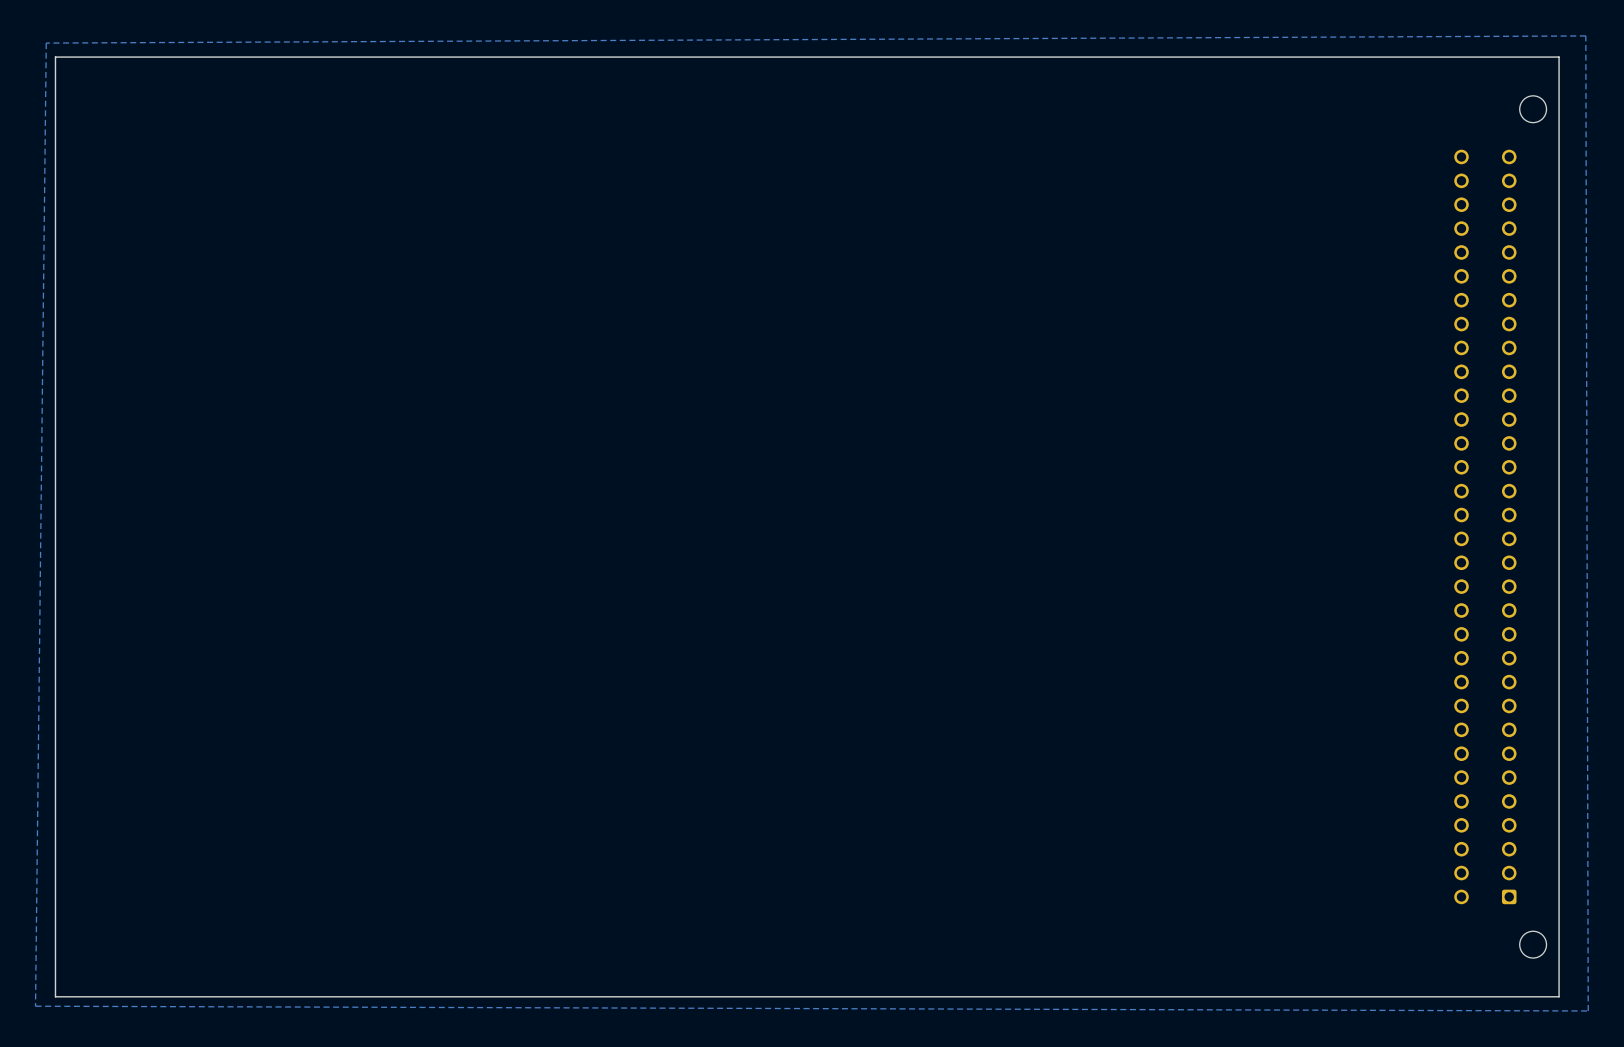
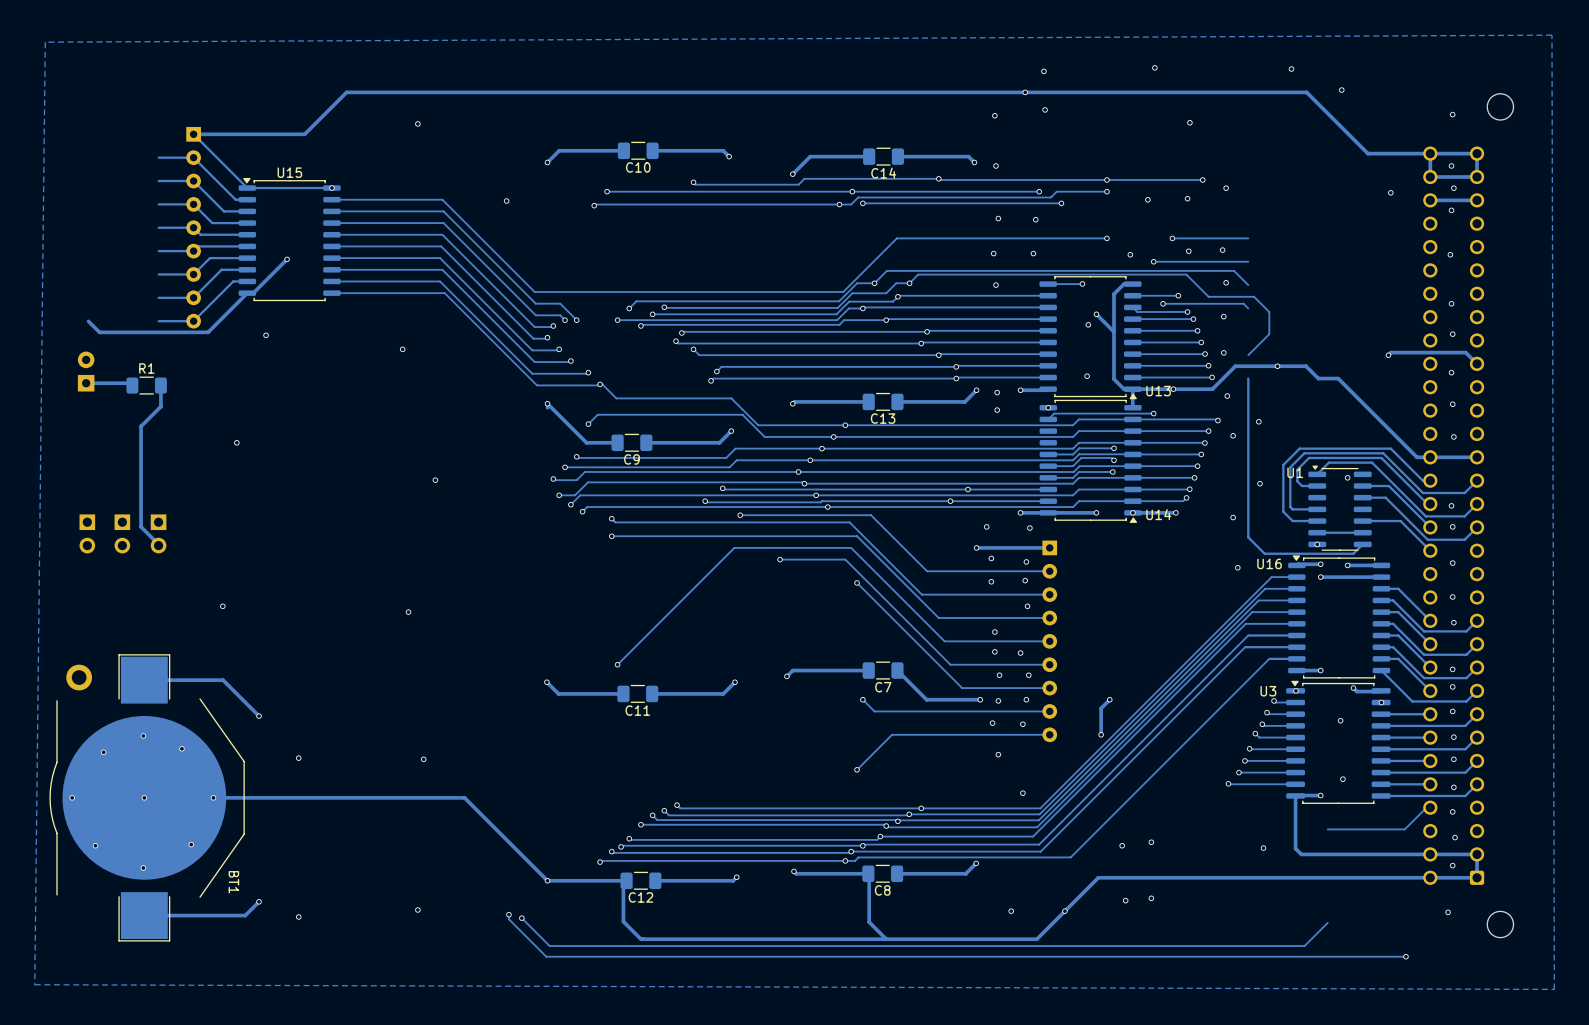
board edge: (1559, 57) (55, 57) (55, 996) (1559, 996) (1559, 57) -> none
via: none -> (1154, 67)
via: none -> (1291, 69)
via: none -> (1043, 71)
via: none -> (1341, 90)
via: none -> (1025, 92)
via: none -> (1045, 109)
via: none -> (1452, 114)
via: none -> (994, 115)
via: none -> (1189, 122)
via: none -> (417, 123)
track: none -> (623, 150) (559, 150) (547, 162)
C10: none -> (638, 150)
track: none -> (652, 150) (723, 150) (729, 156)
track: none -> (1430, 153) (1430, 176) (1477, 176) (1477, 153) (1367, 153) (1306, 92) (346, 92) (304, 134) (193, 134) (247, 188) (331, 188)
via: none -> (729, 156)
track: none -> (869, 156) (810, 156) (792, 174)
C14: none -> (883, 156)
track: none -> (897, 156) (968, 156) (974, 162)
track: none -> (158, 157) (193, 157) (235, 199) (247, 199)
via: none -> (547, 162)
via: none -> (974, 162)
via: none -> (996, 165)
via: none -> (1451, 165)
via: none -> (792, 174)
via: none -> (938, 178)
via: none -> (1106, 179)
track: none -> (1202, 179) (804, 178) (798, 184) (695, 184) (693, 182)
via: none -> (1202, 179)
track: none -> (158, 181) (193, 181) (223, 211) (247, 211)
via: none -> (693, 182)
via: none -> (331, 188)
via: none -> (1226, 188)
via: none -> (1453, 188)
via: none -> (607, 191)
via: none -> (852, 191)
track: none -> (1039, 191) (607, 191)
via: none -> (1039, 191)
track: none -> (1106, 191) (1056, 191) (1050, 197) (858, 197) (851, 204) (594, 205)
via: none -> (1106, 191)
via: none -> (1390, 192)
via: none -> (1187, 198)
track: none -> (331, 199) (442, 199) (534, 291) (843, 291) (896, 238) (1106, 238)
via: none -> (1147, 199)
track: none -> (1477, 200) (1430, 200)
via: none -> (506, 201)
via: none -> (862, 203)
track: none -> (1061, 203) (862, 203)
via: none -> (1061, 203)
track: none -> (158, 204) (193, 204) (212, 223) (247, 223)
via: none -> (839, 204)
via: none -> (594, 205)
via: none -> (1451, 210)
track: none -> (331, 211) (443, 211) (535, 303) (560, 303) (576, 320)
via: none -> (998, 218)
via: none -> (1035, 219)
track: none -> (331, 223) (443, 223) (535, 315) (560, 315) (565, 320)
track: none -> (158, 227) (193, 227) (200, 234) (247, 234)
part: none -> (193, 227)
track: none -> (331, 234) (442, 234) (534, 327) (553, 325)
via: none -> (1106, 238)
via: none -> (1172, 238)
track: none -> (1248, 238) (1172, 238)
U15: none -> (289, 239)
track: none -> (247, 246) (198, 246) (193, 251) (158, 251)
track: none -> (331, 246) (441, 246) (533, 338) (547, 337)
via: none -> (1222, 250)
via: none -> (1188, 251)
via: none -> (993, 253)
via: none -> (1033, 253)
via: none -> (1130, 254)
via: none -> (1450, 254)
track: none -> (247, 258) (209, 258) (193, 274) (158, 274)
track: none -> (331, 258) (440, 258) (532, 350) (559, 349)
track: none -> (287, 259) (253, 293) (247, 293) (208, 332) (99, 332) (88, 321)
via: none -> (287, 259)
via: none -> (1153, 261)
track: none -> (1248, 261) (1153, 261)
track: none -> (247, 269) (221, 269) (193, 297) (158, 297)
track: none -> (331, 269) (442, 269) (534, 362) (570, 361)
track: none -> (247, 281) (233, 281) (193, 321) (158, 321)
track: none -> (331, 281) (440, 281) (532, 373) (588, 372)
via: none -> (1226, 282)
via: none -> (874, 283)
via: none -> (909, 283)
track: none -> (1082, 283) (1048, 284)
via: none -> (1082, 283)
track: none -> (1132, 284) (1124, 284) (1113, 294) (1113, 379) (1124, 389) (1212, 389) (1235, 366) (1306, 366) (1318, 378) (1338, 378) (1417, 457) (1477, 457)
via: none -> (996, 285)
track: none -> (1248, 285) (1234, 270) (886, 270) (874, 283) (857, 283) (839, 301) (636, 301) (629, 308)
track: none -> (331, 293) (444, 293) (537, 385) (602, 384) (616, 398) (731, 398) (758, 425) (1073, 425) (1078, 419) (1217, 420)
track: none -> (1048, 295) (898, 295) (893, 301) (849, 301) (836, 314) (652, 314)
track: none -> (1178, 295) (1132, 295)
via: none -> (1178, 295)
via: none -> (897, 296)
track: none -> (1163, 303) (1243, 303) (1248, 308)
via: none -> (1163, 303)
via: none -> (1451, 303)
track: none -> (664, 307) (837, 307) (852, 293) (886, 293) (896, 283) (909, 283) (918, 274) (1186, 274) (1208, 296) (1254, 296) (1269, 312) (1269, 334) (1248, 355)
via: none -> (664, 307)
track: none -> (1048, 307) (863, 307) (848, 308) (837, 320) (617, 320)
track: none -> (1132, 307) (1137, 311) (1187, 311)
via: none -> (629, 308)
via: none -> (862, 308)
via: none -> (1187, 311)
via: none -> (652, 314)
track: none -> (1096, 314) (1113, 331)
via: none -> (1096, 314)
via: none -> (1223, 316)
track: none -> (1048, 319) (887, 319) (844, 320) (839, 324) (640, 325)
track: none -> (1193, 319) (1132, 319)
via: none -> (1193, 319)
via: none -> (565, 320)
via: none -> (576, 320)
via: none -> (617, 320)
via: none -> (886, 320)
via: none -> (1088, 324)
via: none -> (553, 325)
via: none -> (640, 325)
track: none -> (1048, 330) (681, 333)
track: none -> (1197, 330) (1132, 330)
via: none -> (1197, 330)
via: none -> (927, 331)
via: none -> (681, 333)
via: none -> (1452, 334)
via: none -> (266, 335)
via: none -> (547, 337)
U13: none -> (1090, 337)
track: none -> (675, 341) (678, 343) (1048, 342)
via: none -> (675, 341)
track: none -> (1201, 342) (1132, 342)
via: none -> (1201, 342)
via: none -> (921, 343)
via: none -> (402, 349)
via: none -> (559, 349)
track: none -> (693, 349) (699, 355) (1048, 354)
via: none -> (693, 349)
via: none -> (1223, 352)
track: none -> (1205, 354) (1132, 354)
via: none -> (1205, 354)
via: none -> (938, 355)
track: none -> (1388, 355) (1391, 352) (1465, 352) (1477, 363)
via: none -> (1388, 355)
via: none -> (570, 361)
track: none -> (1048, 365) (721, 366) (716, 371)
track: none -> (1208, 365) (1132, 365)
via: none -> (1208, 365)
via: none -> (956, 366)
via: none -> (1277, 366)
part: none -> (86, 371)
via: none -> (716, 371)
via: none -> (588, 372)
via: none -> (1451, 372)
via: none -> (1087, 376)
track: none -> (1048, 377) (713, 378) (711, 380)
track: none -> (1212, 377) (1132, 377)
via: none -> (1212, 377)
via: none -> (956, 378)
track: none -> (1248, 378) (1248, 537) (1264, 553) (1353, 553) (1362, 544)
via: none -> (711, 380)
track: none -> (86, 383) (130, 383) (132, 385)
via: none -> (600, 384)
R1: none -> (146, 385)
track: none -> (160, 385) (160, 406) (141, 426) (141, 526) (158, 545)
track: none -> (1048, 389) (1020, 390)
track: none -> (1132, 389) (1132, 407)
via: none -> (1173, 389)
track: none -> (976, 390) (964, 401) (897, 401)
via: none -> (976, 390)
via: none -> (1020, 390)
via: none -> (997, 392)
via: none -> (1227, 396)
track: none -> (868, 401) (794, 401) (792, 403)
C13: none -> (883, 401)
via: none -> (547, 403)
via: none -> (792, 403)
via: none -> (1452, 404)
track: none -> (547, 407) (547, 403) (586, 442) (617, 442)
via: none -> (1048, 407)
via: none -> (997, 410)
track: none -> (1153, 413) (1054, 413) (1048, 419)
via: none -> (1153, 413)
via: none -> (1217, 420)
via: none -> (1258, 421)
track: none -> (588, 424) (597, 414) (742, 414) (764, 436) (1073, 436) (1078, 431) (1208, 431)
via: none -> (588, 424)
via: none -> (845, 425)
track: none -> (731, 431) (719, 442) (646, 442)
via: none -> (731, 431)
via: none -> (1208, 431)
via: none -> (1233, 435)
via: none -> (833, 436)
via: none -> (1453, 436)
via: none -> (236, 442)
C9: none -> (631, 442)
track: none -> (1204, 443) (1078, 442) (1073, 448) (735, 448) (726, 457) (576, 456)
via: none -> (1204, 443)
via: none -> (821, 448)
track: none -> (1113, 448) (1079, 448) (1073, 454) (1048, 454)
via: none -> (1113, 448)
track: none -> (1132, 454) (1079, 454) (1073, 460) (736, 460) (729, 467) (565, 467)
track: none -> (1201, 454) (1132, 454)
via: none -> (1201, 454)
via: none -> (576, 456)
via: none -> (810, 460)
track: none -> (1113, 460) (1111, 457) (1081, 457) (1073, 466) (1048, 466)
via: none -> (1113, 460)
U14: none -> (1090, 461)
track: none -> (1197, 466) (1079, 466) (1073, 471) (584, 471) (576, 480) (553, 479)
via: none -> (1197, 466)
via: none -> (565, 467)
via: none -> (798, 471)
track: none -> (1112, 471) (1078, 471) (1073, 477) (1048, 477)
via: none -> (1112, 471)
track: none -> (1317, 474) (1328, 462) (1372, 462) (1425, 516) (1464, 516) (1477, 504)
track: none -> (1194, 477) (1078, 477) (1073, 483) (588, 482) (575, 495) (559, 495)
via: none -> (1194, 477)
via: none -> (1347, 477)
via: none -> (553, 479)
via: none -> (435, 480)
track: none -> (1430, 480) (1422, 480) (1390, 448) (1299, 448) (1283, 464) (1283, 511) (1292, 521) (1317, 521)
track: none -> (1477, 480) (1464, 493) (1423, 493) (1383, 453) (1304, 453) (1290, 467) (1290, 507) (1292, 509) (1317, 509)
via: none -> (804, 483)
via: none -> (1259, 483)
track: none -> (1317, 486) (1302, 486) (1297, 481) (1297, 469) (1309, 457) (1381, 457) (1427, 504)
track: none -> (1362, 486) (1388, 486) (1430, 527)
track: none -> (722, 488) (1048, 489)
via: none -> (722, 488)
track: none -> (1189, 489) (1078, 489) (1073, 495) (580, 495) (570, 504)
via: none -> (1189, 489)
via: none -> (967, 489)
via: none -> (559, 495)
via: none -> (816, 495)
track: none -> (1186, 497) (1183, 501) (1078, 501) (1073, 507) (587, 507) (582, 511)
via: none -> (1186, 497)
track: none -> (1362, 497) (1385, 497) (1427, 539) (1464, 539) (1477, 527)
via: none -> (705, 501)
via: none -> (950, 501)
track: none -> (1048, 501) (705, 501)
via: none -> (570, 504)
via: none -> (1451, 505)
via: none -> (827, 507)
U1: none -> (1340, 508)
via: none -> (582, 511)
via: none -> (1020, 512)
track: none -> (1096, 512) (1020, 512)
via: none -> (1096, 512)
via: none -> (1132, 512)
track: none -> (1175, 512) (1132, 512)
via: none -> (1175, 512)
track: none -> (740, 515) (871, 515) (927, 571) (1049, 571)
via: none -> (740, 515)
via: none -> (1233, 517)
track: none -> (611, 518) (615, 522) (849, 522) (921, 594) (1049, 594)
via: none -> (611, 518)
track: none -> (1362, 521) (1400, 521) (1430, 550)
via: none -> (986, 526)
via: none -> (1452, 526)
via: none -> (1029, 528)
track: none -> (1362, 532) (1317, 532)
part: none -> (87, 533)
part: none -> (122, 533)
part: none -> (158, 533)
track: none -> (611, 536) (857, 536) (938, 617) (1049, 617)
via: none -> (611, 536)
via: none -> (1317, 544)
via: none -> (976, 547)
track: none -> (1049, 547) (976, 547)
via: none -> (991, 558)
track: none -> (780, 559) (845, 559) (950, 664) (1049, 664)
via: none -> (780, 559)
via: none -> (1026, 561)
via: none -> (1452, 563)
track: none -> (1320, 564) (1296, 565)
via: none -> (1320, 564)
via: none -> (1347, 565)
track: none -> (1381, 565) (1347, 565)
via: none -> (1237, 567)
track: none -> (1296, 577) (1271, 577) (1040, 808) (680, 808) (677, 805)
via: none -> (1320, 577)
track: none -> (1381, 577) (1320, 577)
via: none -> (1025, 580)
via: none -> (991, 581)
track: none -> (857, 582) (962, 688) (1049, 688)
via: none -> (857, 582)
track: none -> (1296, 588) (1265, 588) (1039, 814) (668, 815) (664, 810)
track: none -> (1381, 588) (1398, 588) (1430, 620)
via: none -> (1452, 596)
track: none -> (1296, 600) (1258, 600) (1038, 820) (657, 820) (652, 815)
track: none -> (1381, 600) (1393, 600) (1424, 631) (1466, 631) (1477, 620)
via: none -> (222, 606)
via: none -> (1027, 606)
via: none -> (408, 612)
track: none -> (1296, 612) (1252, 612) (1037, 827) (887, 827) (884, 824) (640, 824)
track: none -> (1381, 612) (1398, 612) (1430, 644)
U16: none -> (1339, 616)
via: none -> (1453, 622)
track: none -> (1296, 623) (1245, 623) (1033, 836) (880, 836) (877, 839) (629, 838)
track: none -> (1381, 623) (1393, 623) (1424, 654) (1466, 654) (1477, 644)
via: none -> (994, 632)
track: none -> (1296, 635) (1248, 635) (1039, 844) (621, 846)
track: none -> (1381, 635) (1398, 635) (1430, 667)
track: none -> (1049, 641) (944, 641) (851, 547) (734, 547) (617, 664)
part: none -> (1049, 641)
track: none -> (1296, 647) (1245, 647) (1040, 851) (611, 851)
track: none -> (1381, 647) (1393, 647) (1424, 678) (1466, 678) (1477, 667)
via: none -> (994, 651)
via: none -> (1020, 653)
track: none -> (1296, 658) (1269, 658) (1070, 857) (858, 857) (854, 860) (600, 862)
track: none -> (1381, 658) (1398, 658) (1430, 690)
via: none -> (617, 664)
via: none -> (1452, 669)
track: none -> (868, 670) (792, 670) (786, 676)
C7: none -> (883, 670)
track: none -> (897, 670) (926, 699) (980, 699)
track: none -> (1320, 670) (1296, 670)
via: none -> (1320, 670)
track: none -> (1381, 670) (1412, 701) (1466, 701) (1477, 690)
via: none -> (999, 675)
via: none -> (1028, 675)
via: none -> (786, 676)
part: none -> (79, 677)
track: none -> (144, 680) (223, 680) (259, 716)
track: none -> (546, 682) (558, 693) (623, 693)
via: none -> (546, 682)
track: none -> (734, 682) (723, 693) (652, 693)
via: none -> (734, 682)
via: none -> (1452, 686)
track: none -> (1353, 688) (1356, 691) (1380, 691)
via: none -> (1353, 688)
via: none -> (1295, 690)
C11: none -> (637, 693)
track: none -> (862, 699) (874, 711) (1049, 711)
via: none -> (862, 699)
via: none -> (980, 699)
via: none -> (1026, 699)
track: none -> (1109, 699) (1101, 708) (1101, 734)
via: none -> (1109, 699)
via: none -> (998, 700)
track: none -> (1274, 700) (1295, 702)
via: none -> (1274, 700)
via: none -> (1381, 702)
via: none -> (1452, 711)
track: none -> (1267, 712) (1268, 714) (1295, 714)
via: none -> (1267, 712)
track: none -> (1430, 714) (1381, 714)
track: none -> (1477, 714) (1465, 725) (1381, 725)
via: none -> (259, 716)
via: none -> (1340, 720)
via: none -> (992, 723)
via: none -> (1022, 724)
track: none -> (1262, 724) (1263, 725) (1295, 725)
via: none -> (1262, 724)
track: none -> (1255, 733) (1259, 737) (1295, 737)
via: none -> (1255, 733)
track: none -> (1049, 734) (892, 734) (857, 769)
via: none -> (1101, 734)
via: none -> (143, 735)
track: none -> (1430, 737) (1381, 737)
via: none -> (1453, 737)
track: none -> (1477, 737) (1465, 749) (1381, 749)
U3: none -> (1338, 742)
via: none -> (181, 748)
track: none -> (1249, 748) (1295, 749)
via: none -> (1249, 748)
via: none -> (103, 752)
via: none -> (998, 754)
via: none -> (298, 758)
via: none -> (423, 759)
via: none -> (1453, 759)
via: none -> (1244, 760)
track: none -> (1295, 760) (1244, 760)
track: none -> (1430, 760) (1381, 760)
track: none -> (1477, 760) (1465, 772) (1381, 772)
via: none -> (857, 769)
via: none -> (1238, 772)
track: none -> (1295, 772) (1238, 772)
via: none -> (1342, 779)
track: none -> (1228, 783) (1295, 784)
via: none -> (1228, 783)
track: none -> (1430, 784) (1381, 784)
track: none -> (1477, 784) (1465, 796) (1381, 796)
via: none -> (1453, 787)
via: none -> (1022, 793)
track: none -> (1320, 795) (1296, 795)
via: none -> (1320, 795)
track: none -> (1295, 795) (1295, 848) (1301, 854) (1477, 854) (1477, 877) (1098, 877) (1036, 939) (640, 939) (623, 921) (623, 883)
via: none -> (72, 797)
track: none -> (144, 797) (464, 797) (547, 880) (626, 880)
via: none -> (144, 797)
BT1: none -> (147, 797)
via: none -> (213, 797)
via: none -> (677, 805)
track: none -> (1426, 807) (1404, 829) (1327, 829)
via: none -> (921, 808)
via: none -> (664, 810)
via: none -> (1452, 811)
via: none -> (909, 814)
via: none -> (652, 815)
via: none -> (897, 821)
via: none -> (640, 824)
via: none -> (886, 826)
via: none -> (880, 836)
via: none -> (1455, 837)
via: none -> (629, 838)
via: none -> (1151, 842)
via: none -> (191, 844)
via: none -> (95, 845)
via: none -> (862, 845)
via: none -> (1122, 845)
via: none -> (621, 846)
via: none -> (1263, 848)
via: none -> (611, 851)
via: none -> (851, 851)
via: none -> (845, 860)
via: none -> (600, 862)
track: none -> (976, 863) (965, 873) (897, 873)
via: none -> (976, 863)
via: none -> (1452, 865)
via: none -> (143, 867)
track: none -> (793, 871) (796, 873) (868, 873)
via: none -> (793, 871)
C8: none -> (882, 873)
track: none -> (869, 874) (869, 922) (886, 939)
track: none -> (736, 877) (733, 880) (655, 880)
via: none -> (736, 877)
via: none -> (547, 880)
C12: none -> (640, 880)
via: none -> (1151, 898)
via: none -> (1125, 900)
track: none -> (259, 901) (245, 915) (144, 915)
via: none -> (259, 901)
via: none -> (417, 909)
via: none -> (1011, 911)
via: none -> (1064, 911)
via: none -> (1448, 912)
track: none -> (508, 914) (508, 919) (546, 956) (1405, 956)
via: none -> (508, 914)
via: none -> (298, 917)
track: none -> (521, 918) (549, 946) (1304, 946) (1327, 922)
via: none -> (521, 918)
via: none -> (1405, 956)

